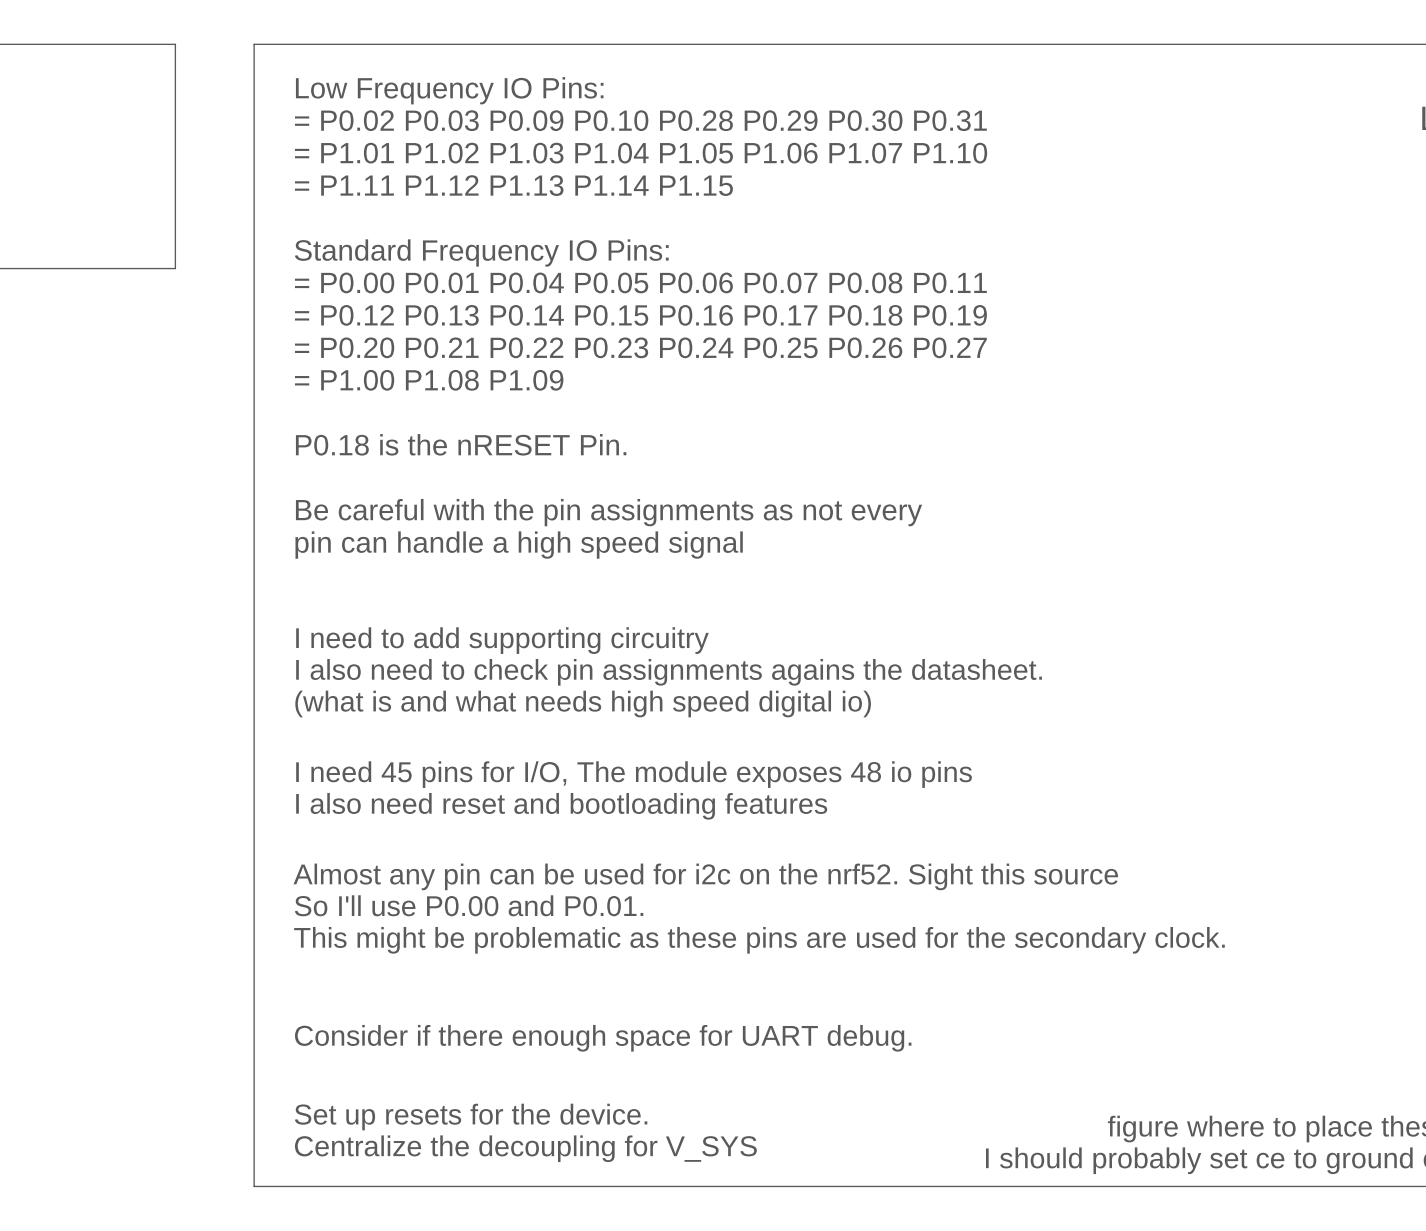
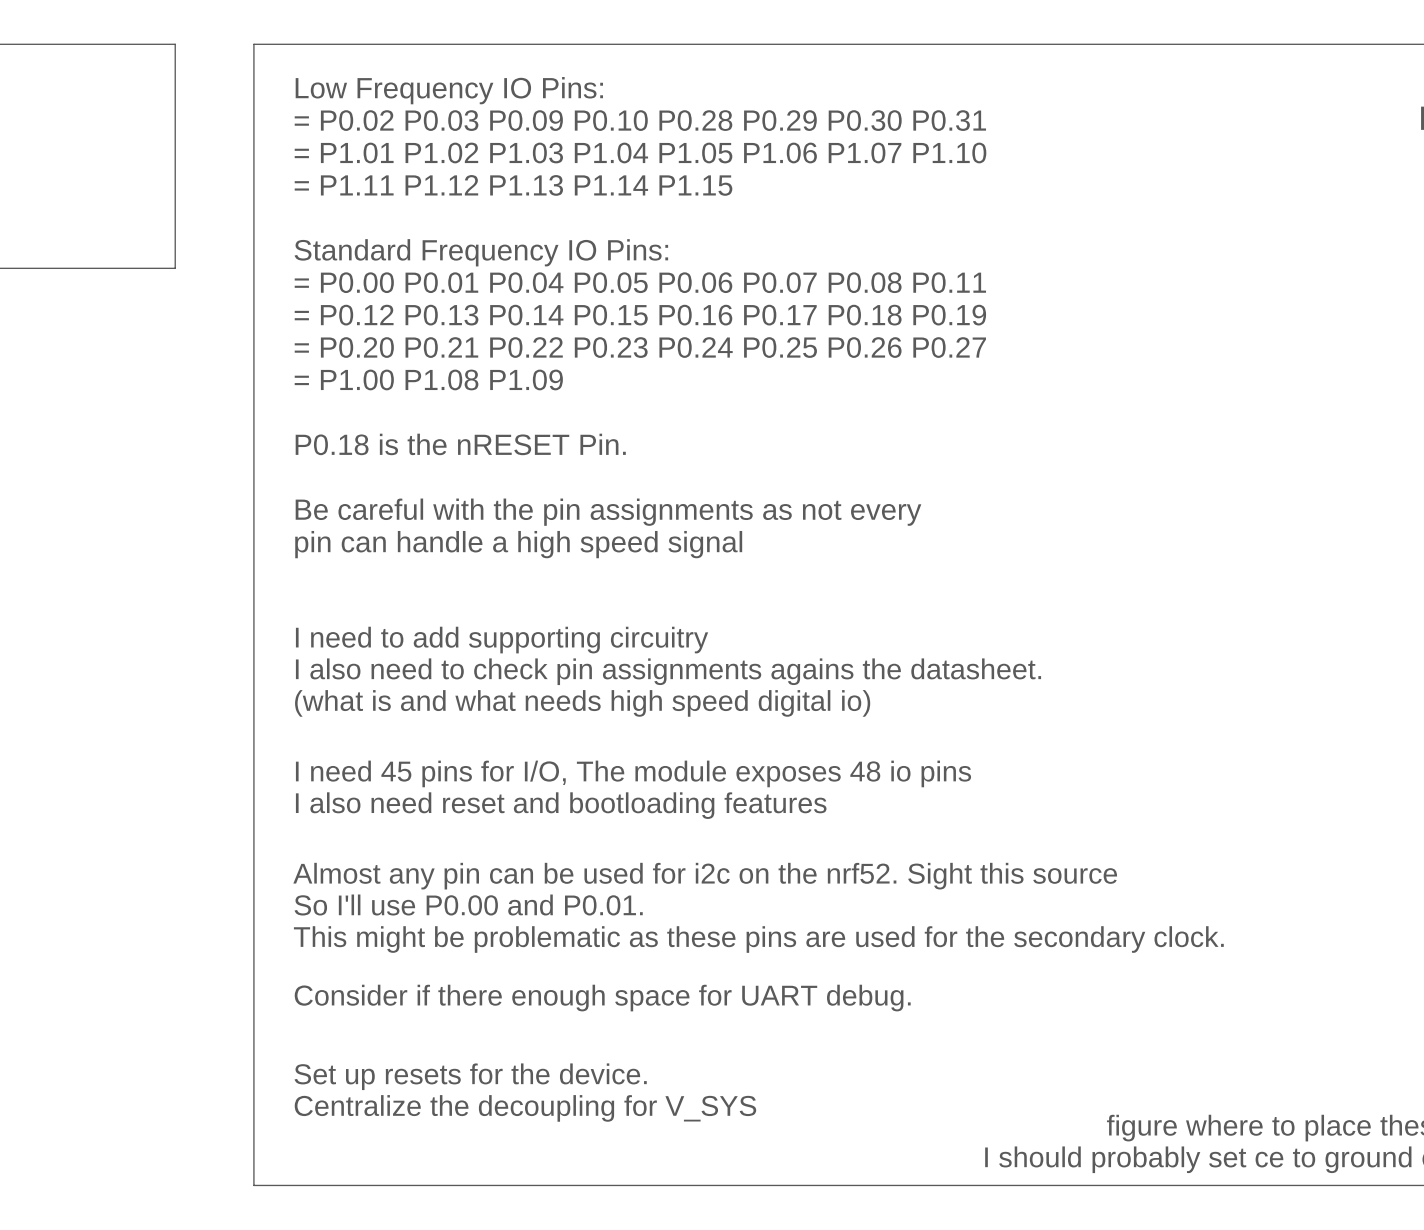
text position: Consider if there enough space for UART debug. (603, 1038) -> Consider if there enough space for UART debug. (602, 998)
text position: Set up resets for the device. (471, 1117) -> Set up resets for the device. (470, 1076)
text position: Centralize the decoupling for V_SYS (525, 1148) -> Centralize the decoupling for V_SYS (525, 1108)

